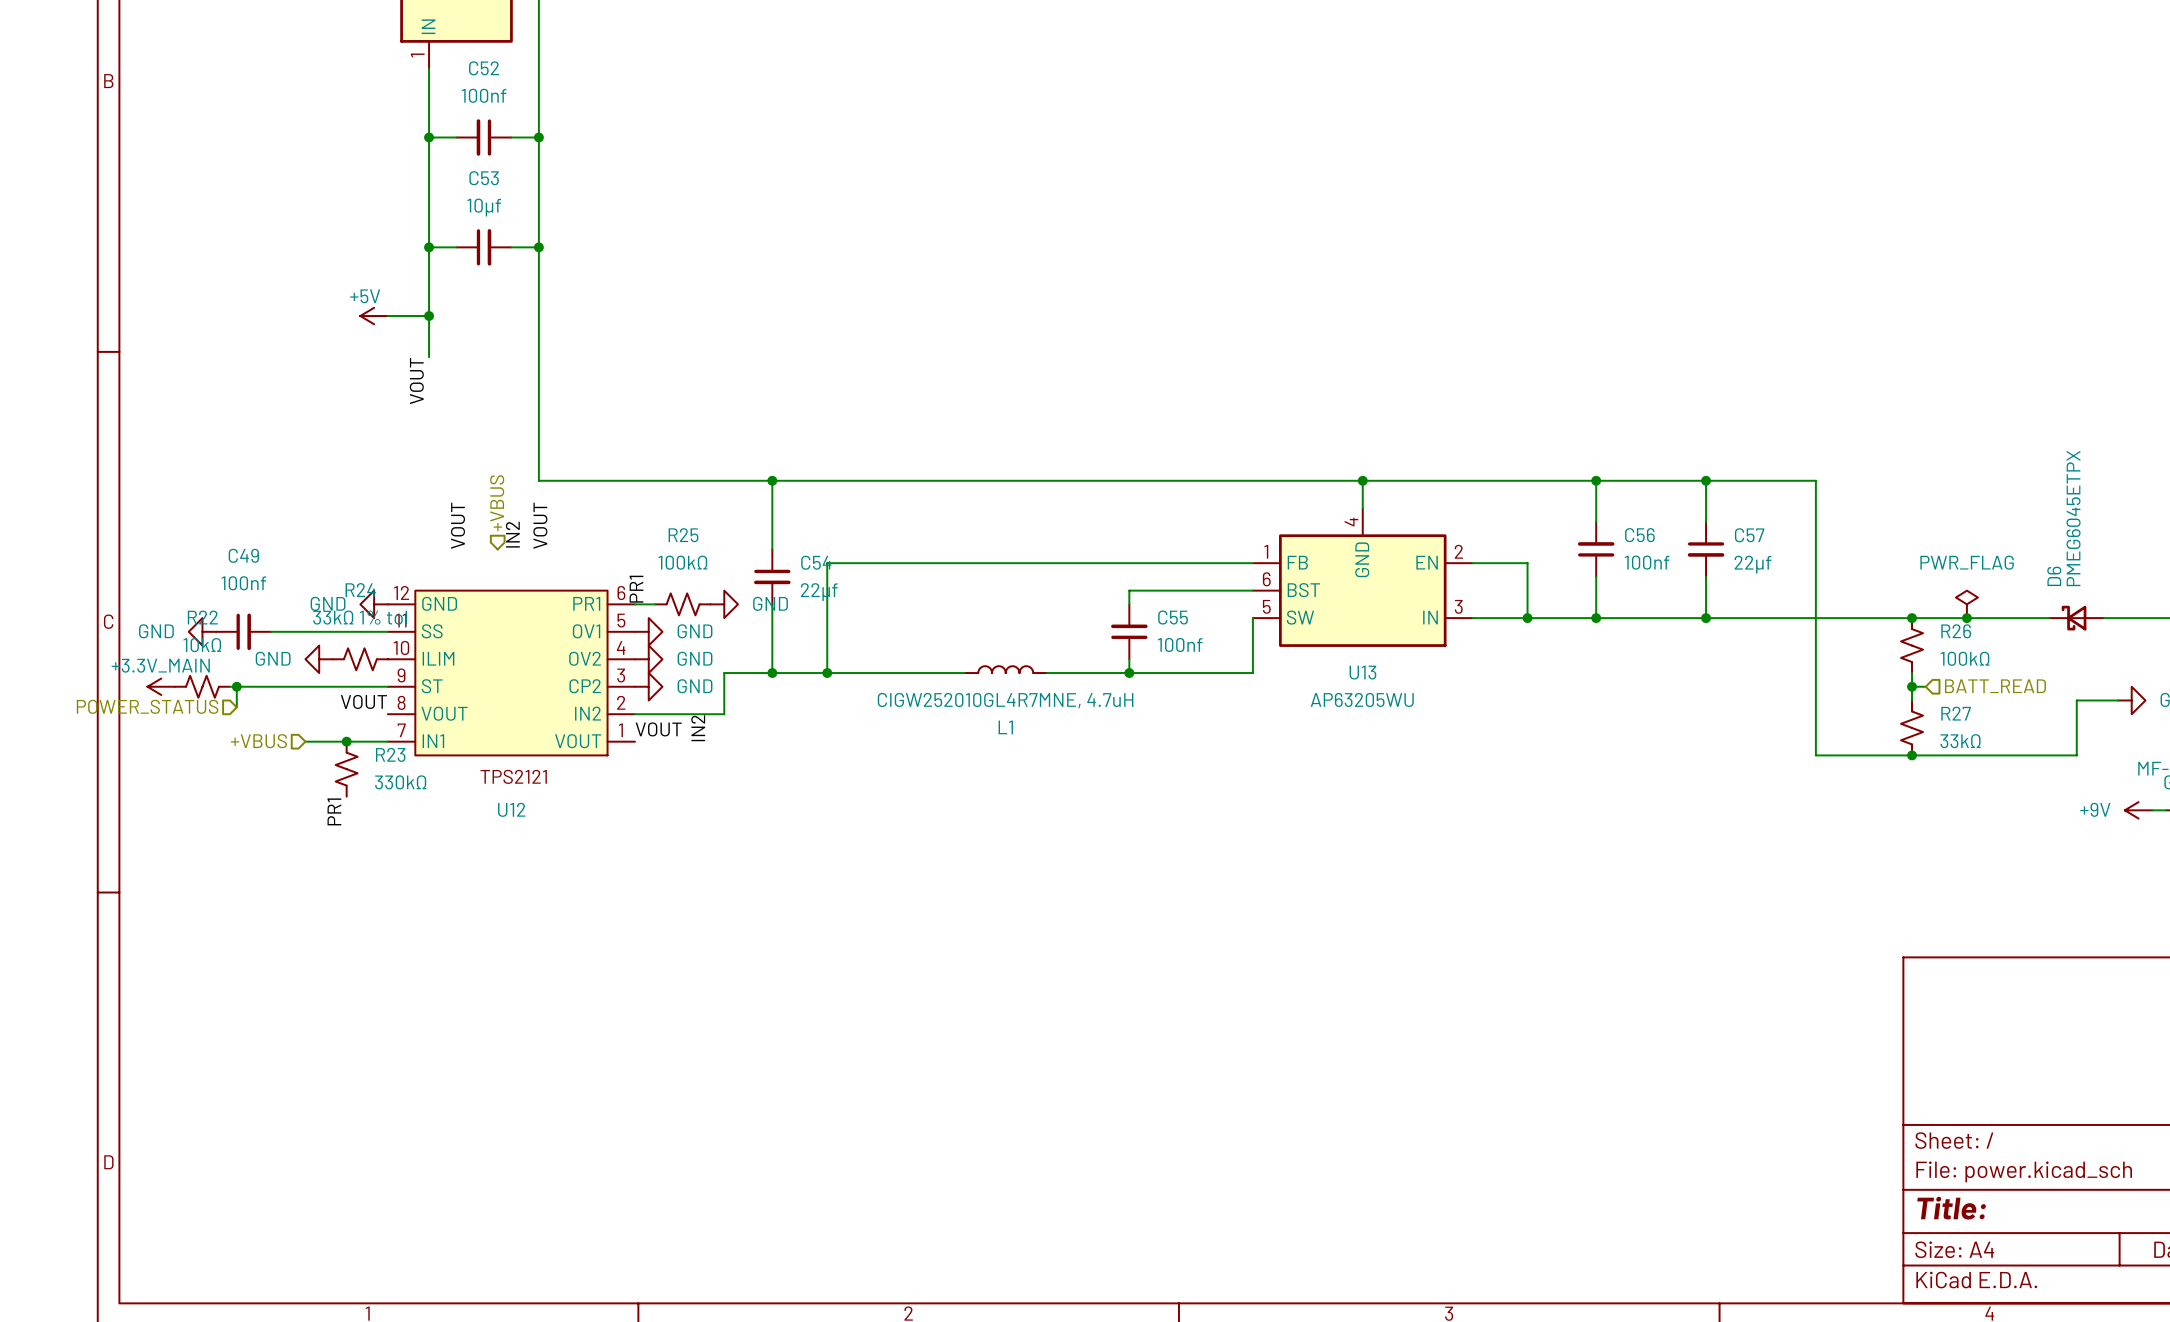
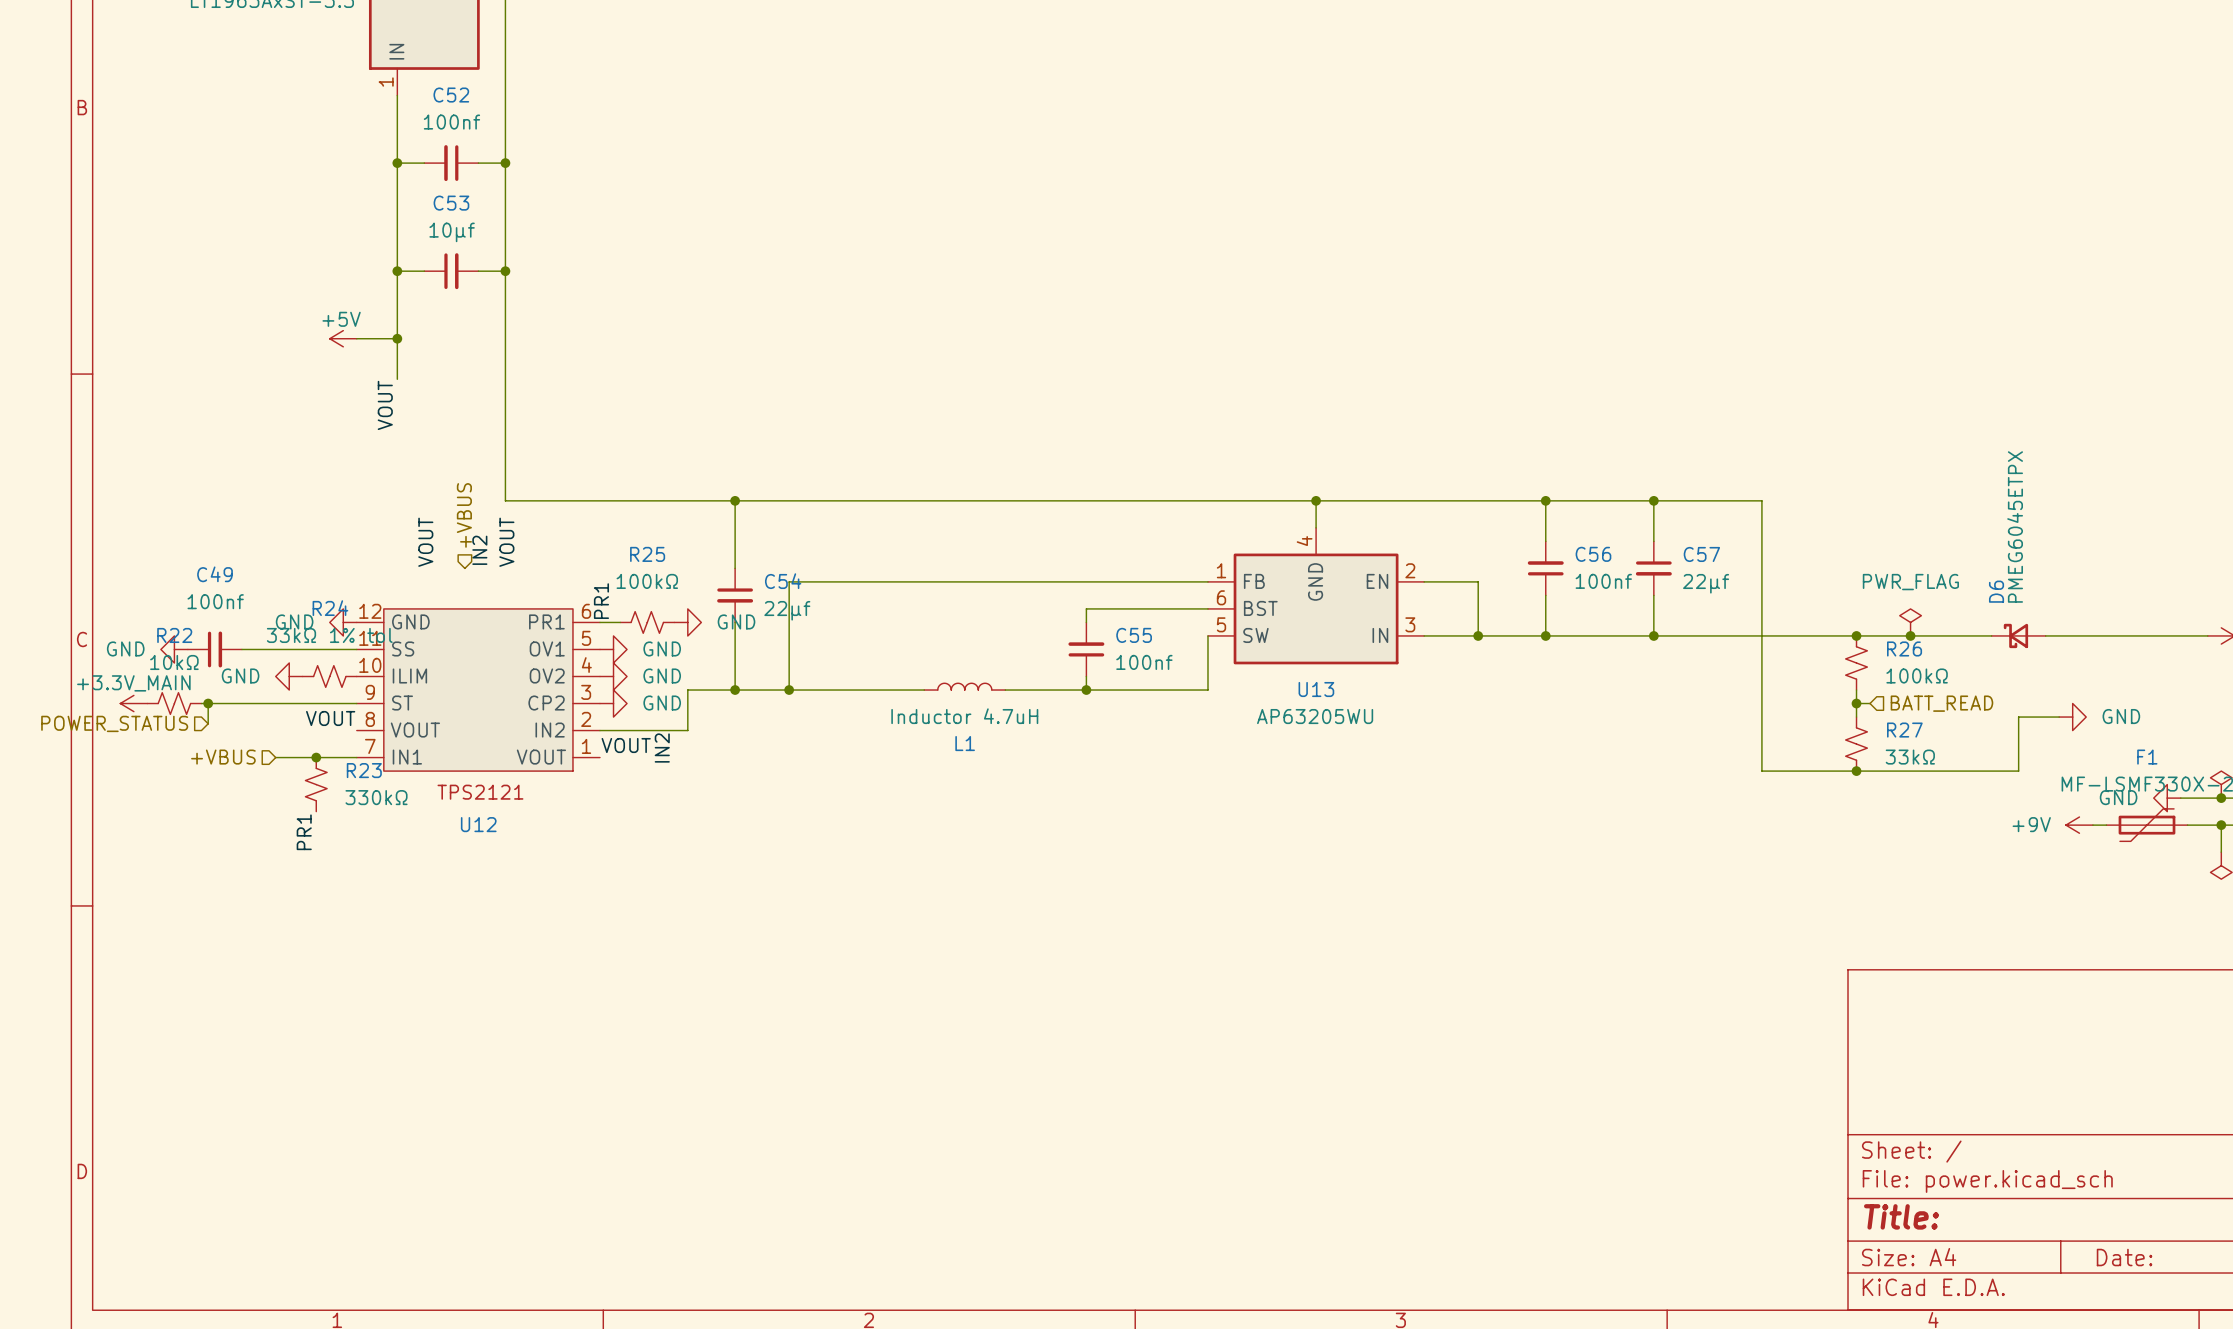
L1 value: CIGW252010GL4R7MNE, 4.7uH (1005, 700) -> Inductor 4.7uH (964, 716)

